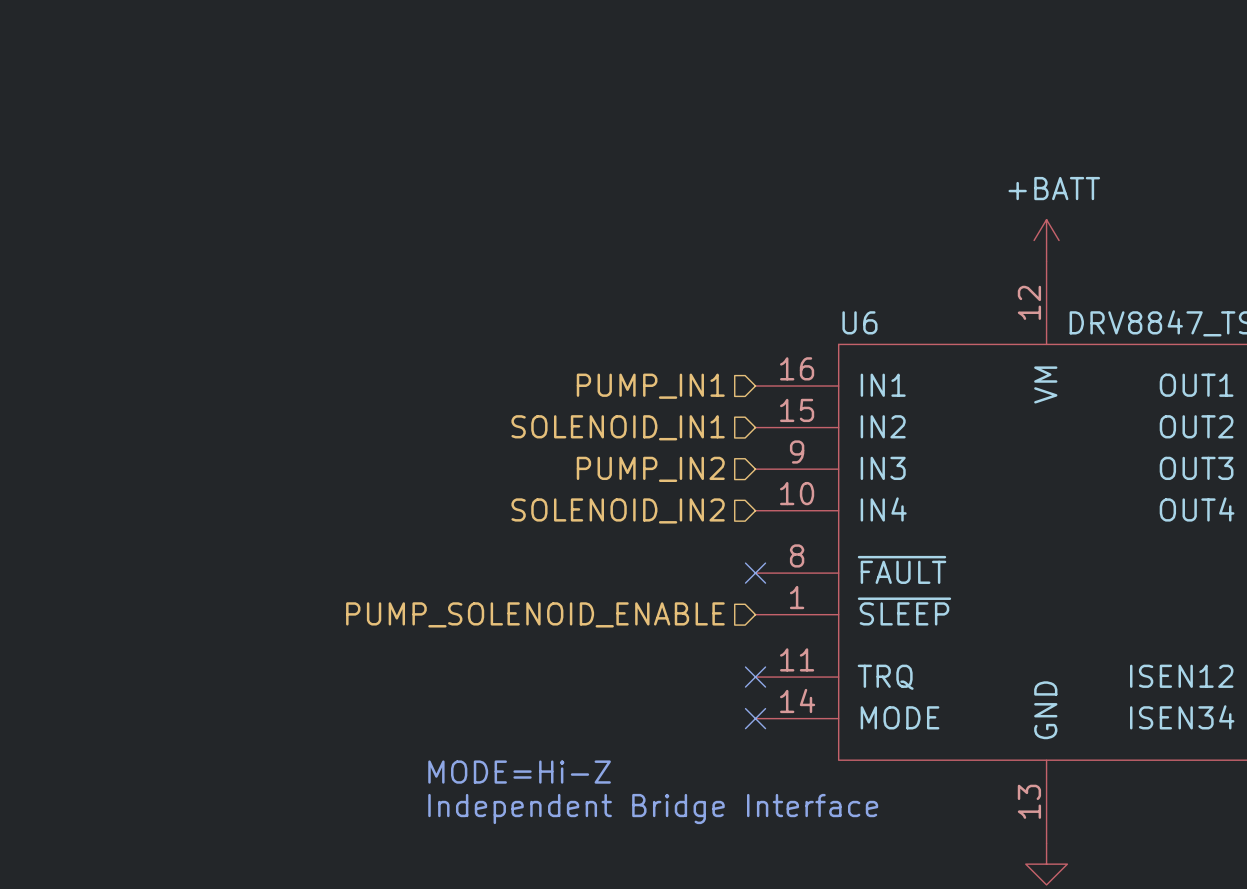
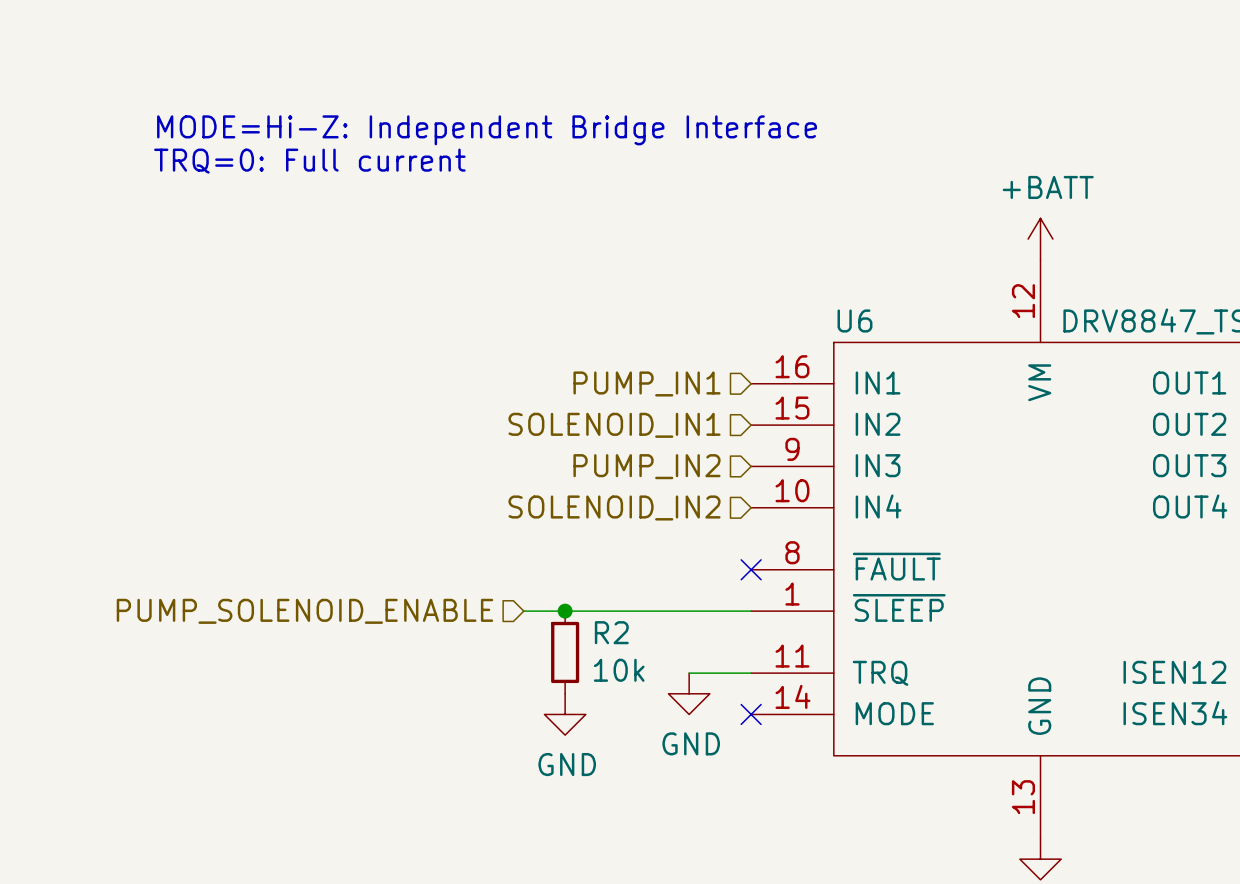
text: none -> MODE=Hi-Z: Independent Bridge Interface (487, 130)
text: none -> TRQ=0: Full current (309, 161)
wire: none -> (523, 611) (751, 611)
hierarchical label position: PUMP_SOLENOID_ENABLE (535, 614) -> PUMP_SOLENOID_ENABLE (304, 611)
junction: none -> (565, 611)
R2: none -> 10k (565, 652)
wire: none -> (689, 673) (751, 673)
no-connect mark: (755, 677) -> none
power symbol: none -> GND (689, 693)
power symbol: none -> GND (565, 714)
text: MODE=Hi-Z (519, 772) -> none
text: Independent Bridge Interface (653, 809) -> none

